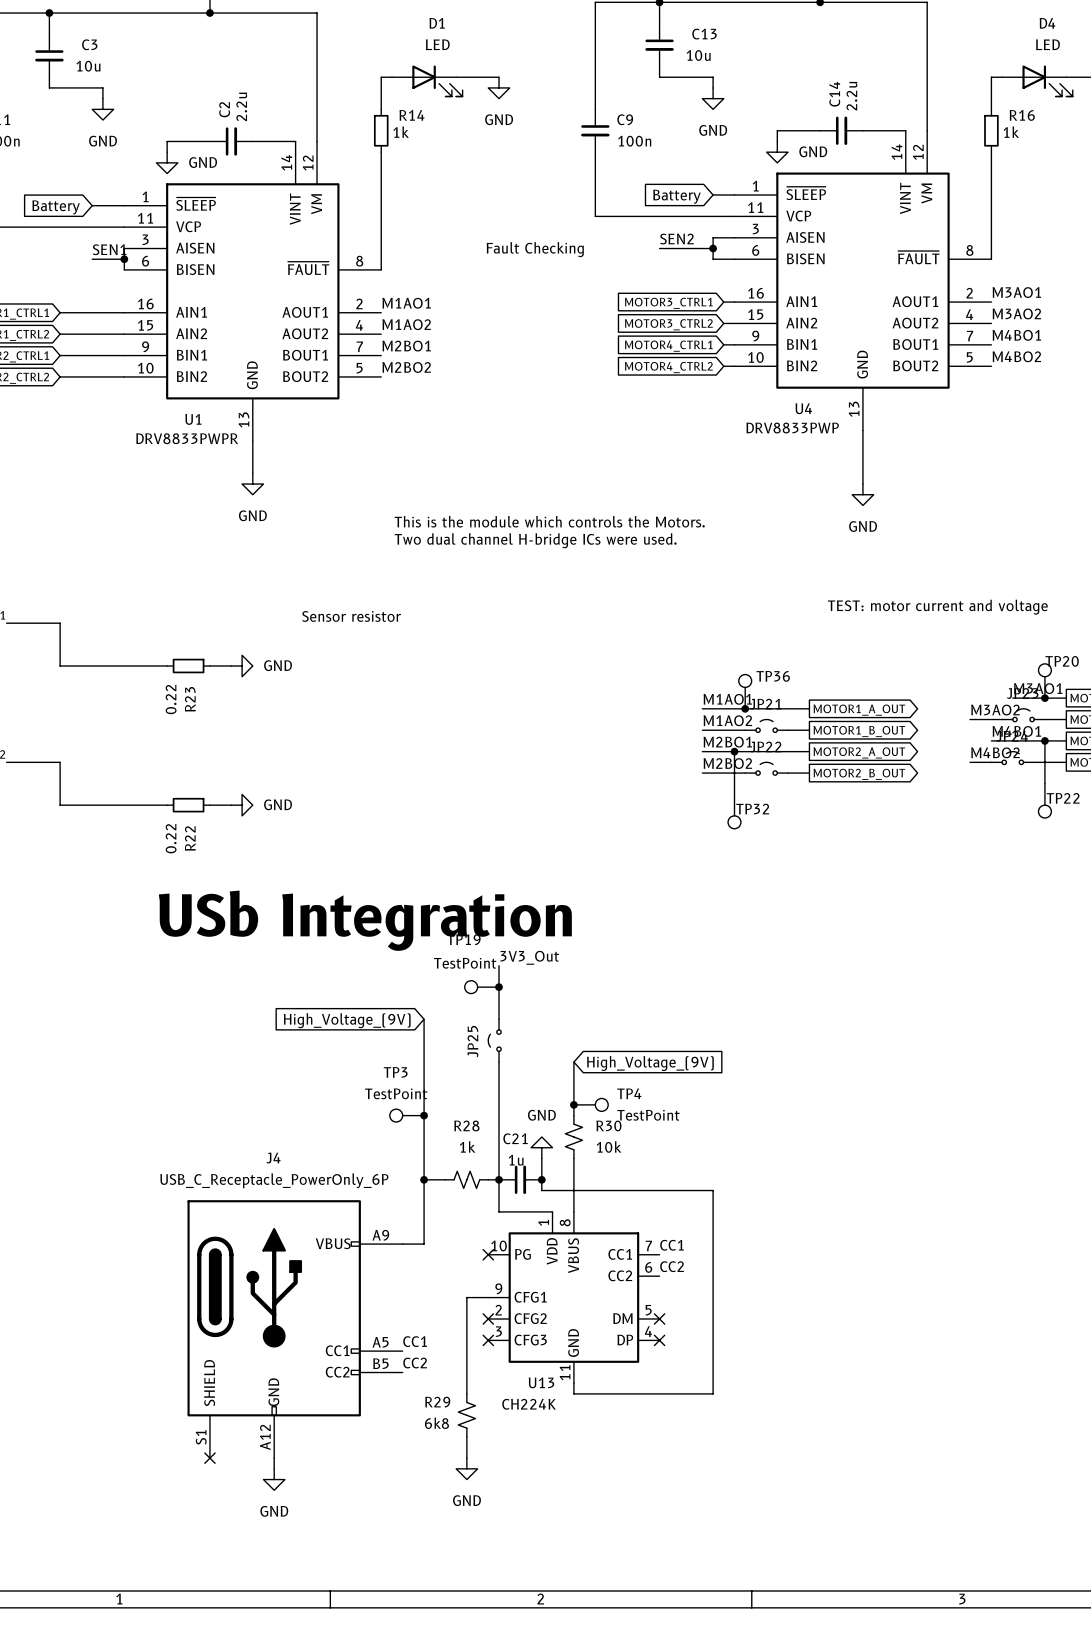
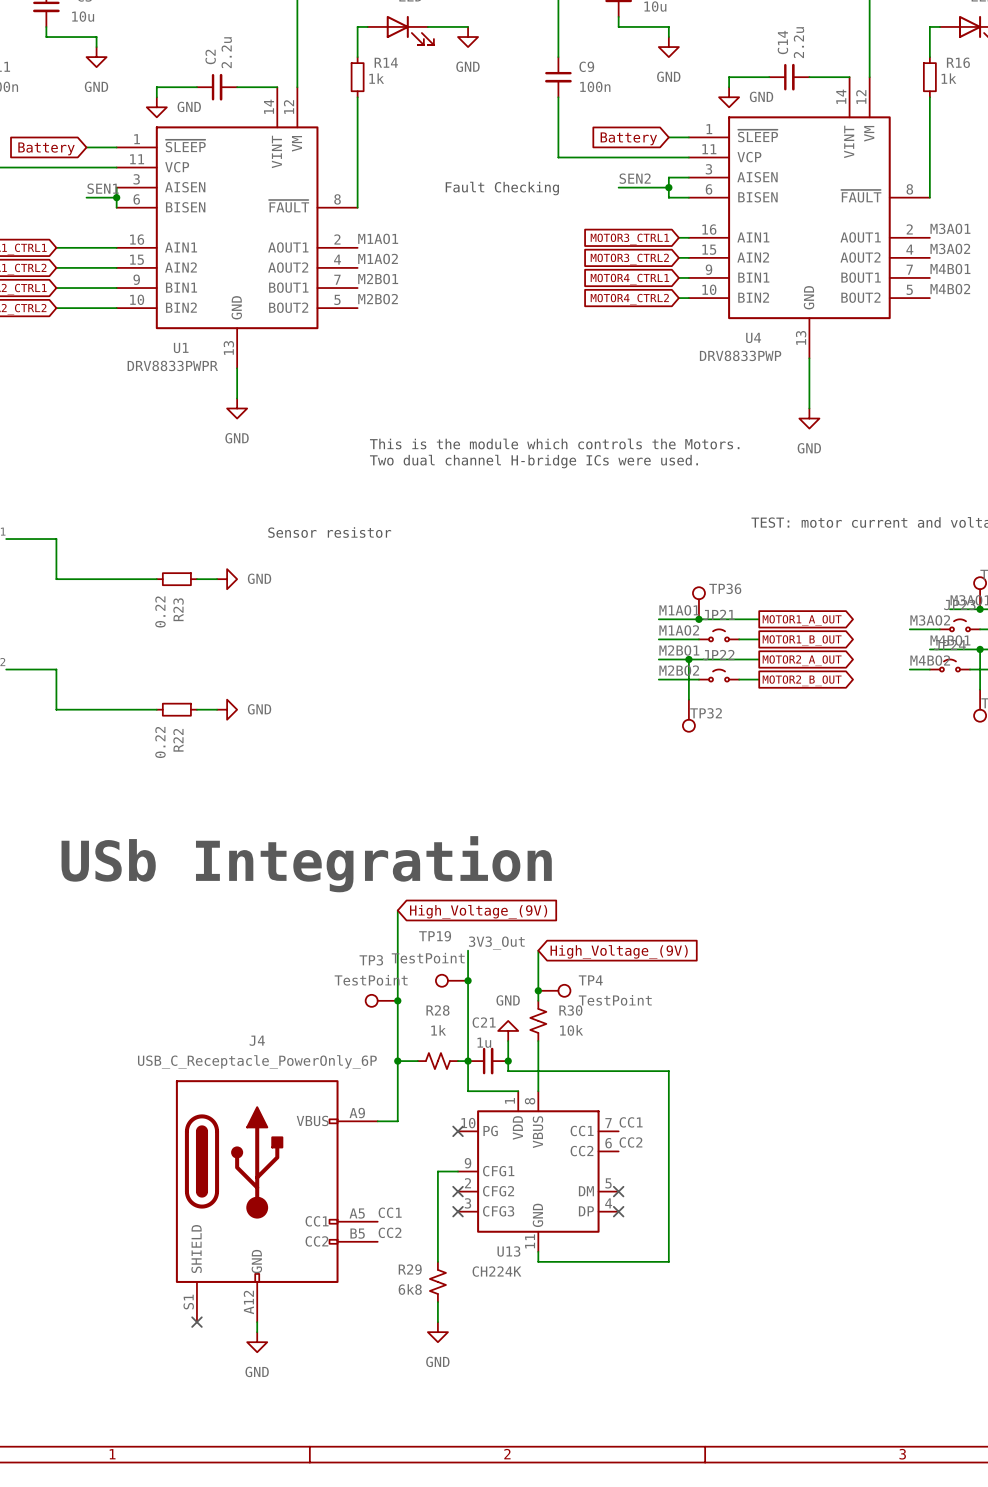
text position: USb Integration (365, 920) -> USb Integration (306, 864)
label position: 3V3_Out (529, 957) -> 3V3_Out (496, 943)
wire: (499, 965) (499, 1019) -> none
TP19 position: (481, 987) -> (451, 980)
junction: (499, 987) -> none
global label rotation: 0° (347, 1020) -> 180° (478, 911)
JP25: (494, 1040) -> none
junction: none -> (468, 980)

